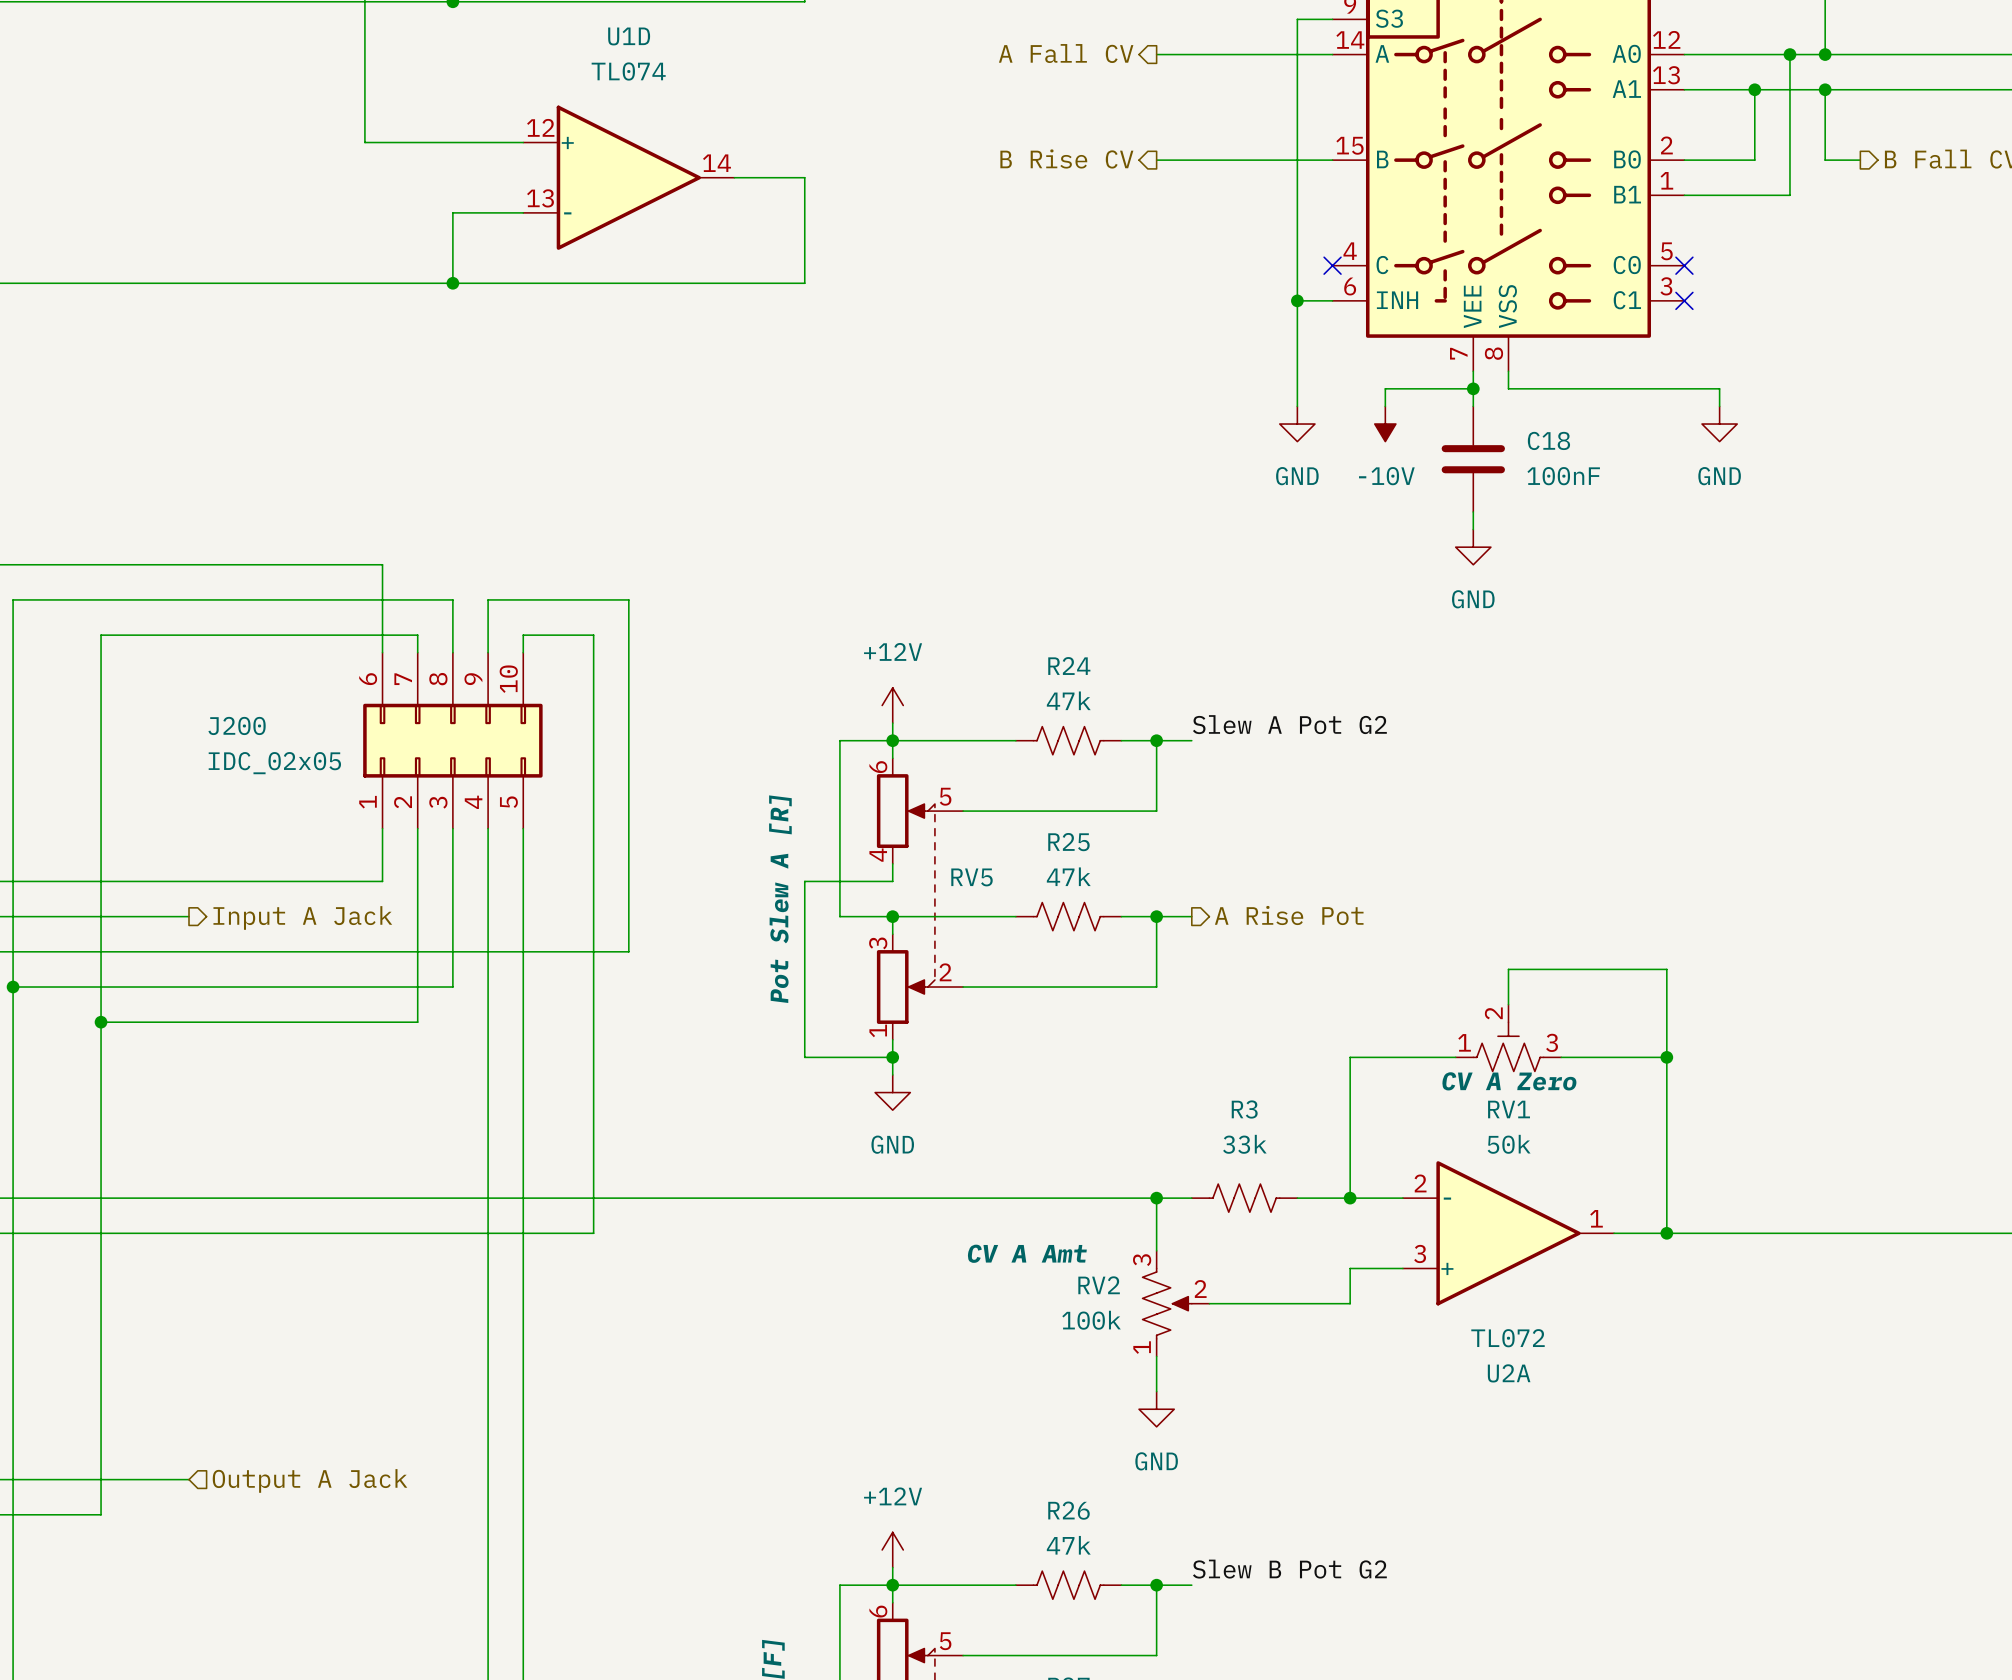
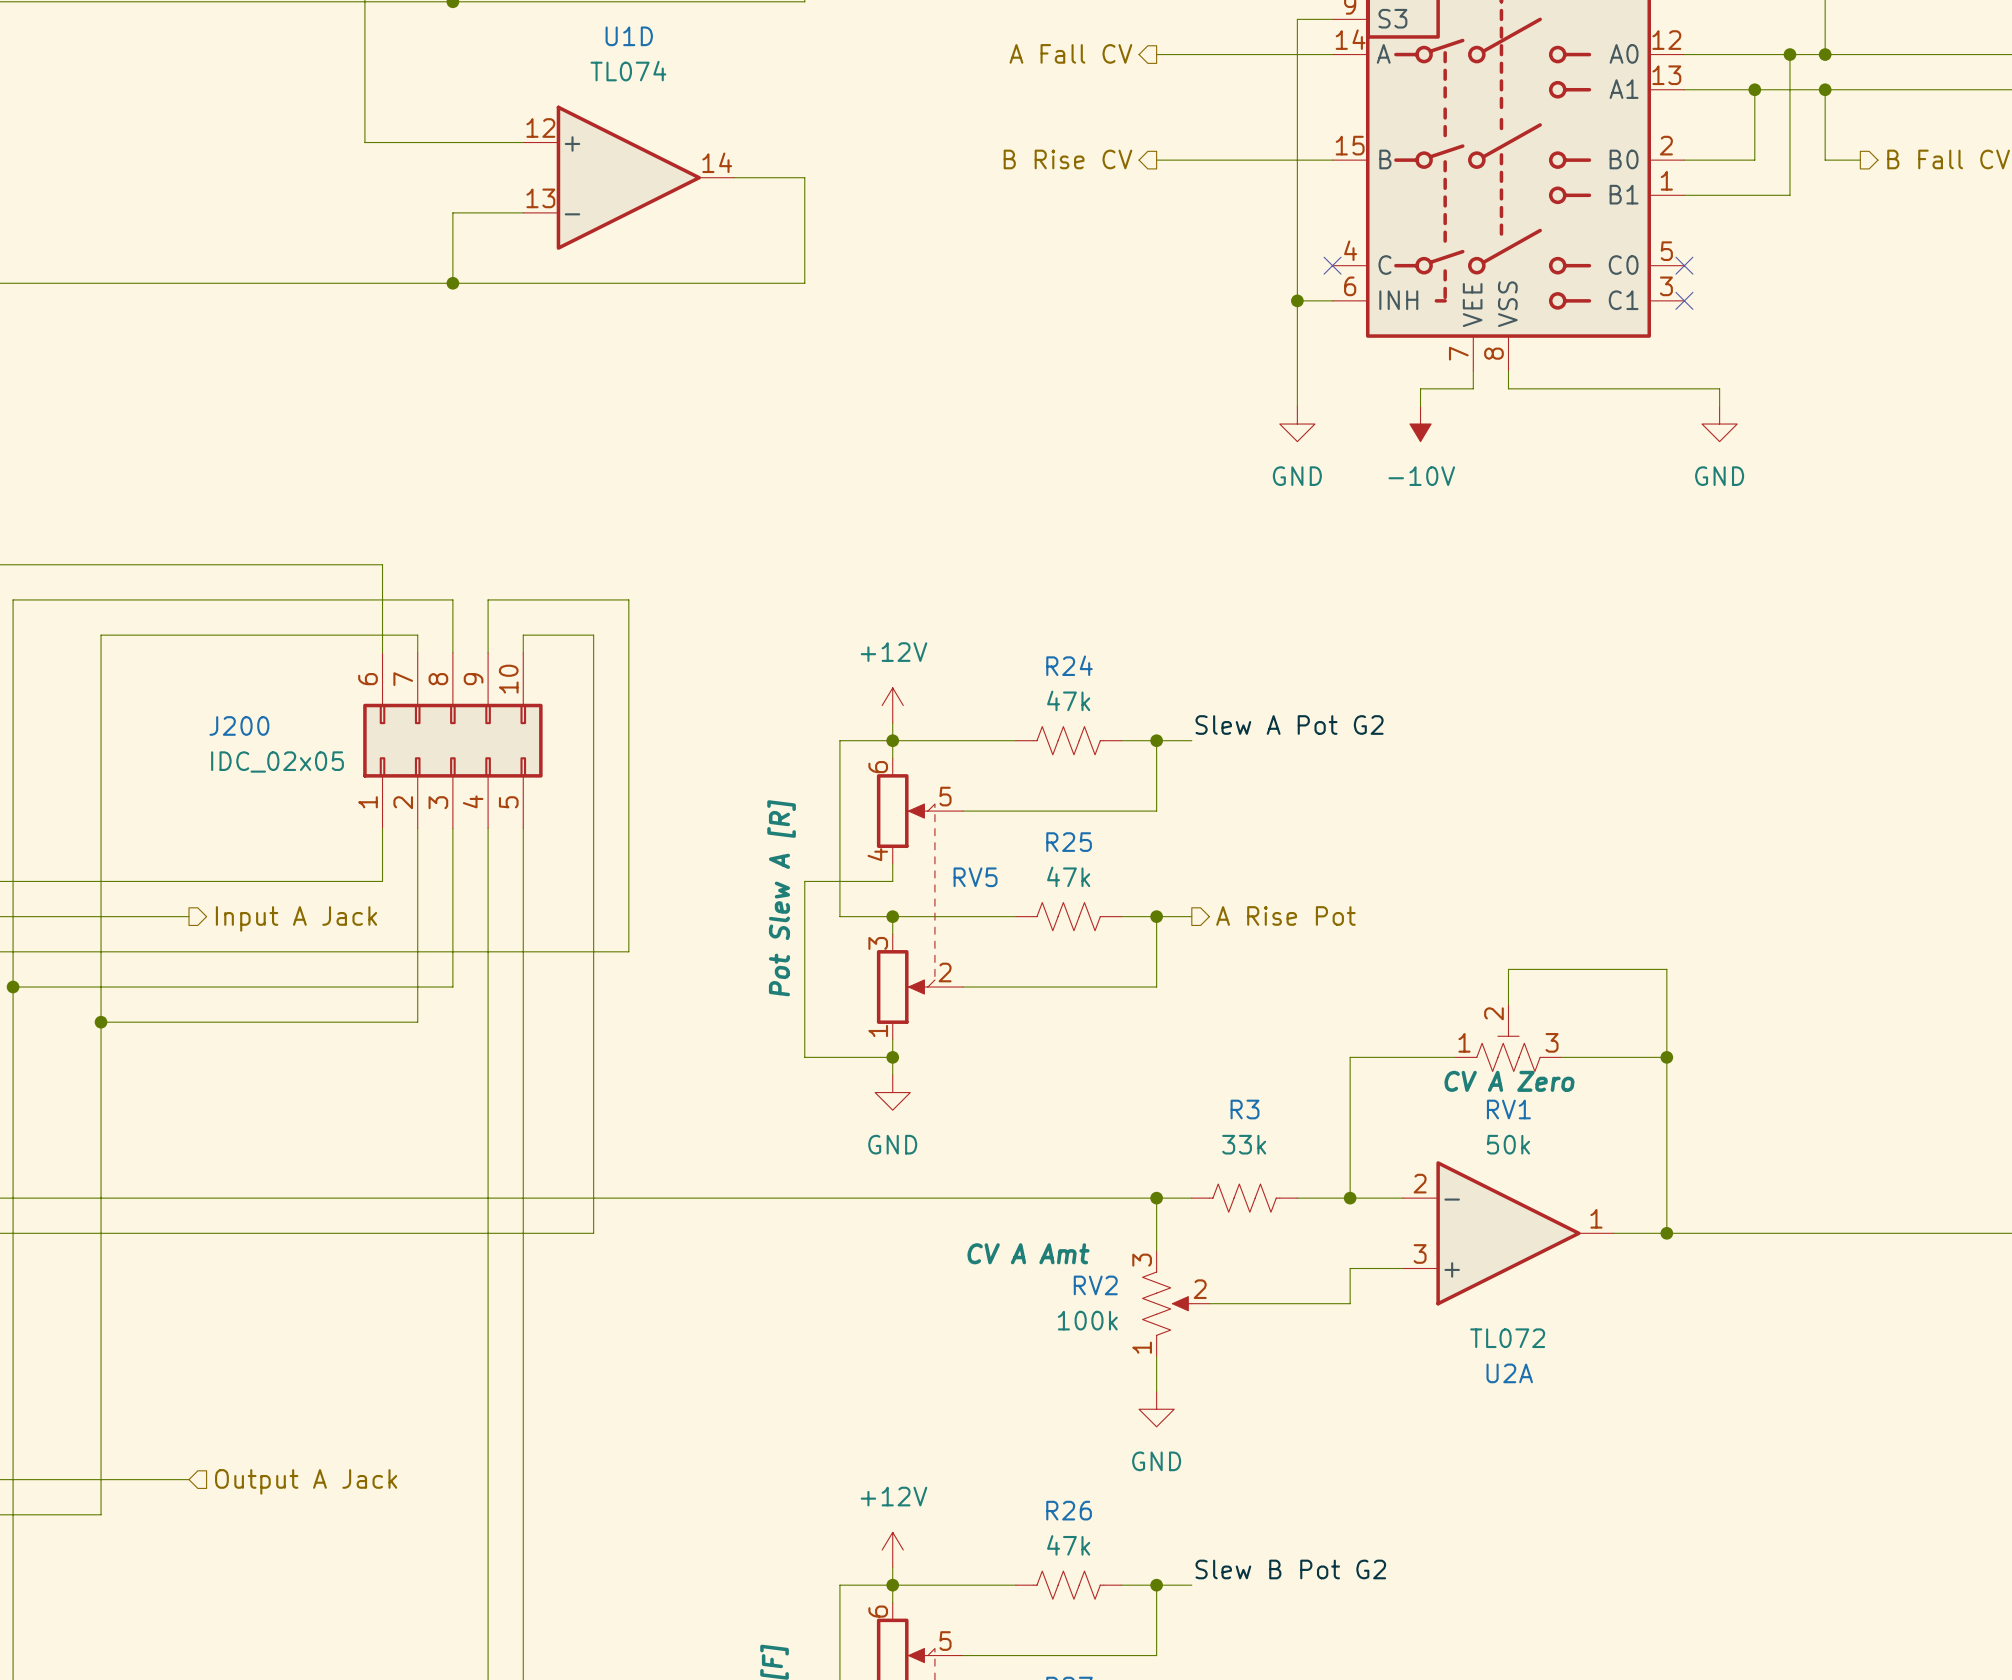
wire: (1420, 388) (1385, 388) (1385, 406) -> (1420, 388) (1420, 406)
wire: (1473, 388) (1473, 406) -> none
junction: (1473, 388) -> none
power symbol position: -10V (1385, 424) -> -10V (1420, 424)
C18: 100nF (1473, 459) -> none
wire: (1473, 511) (1473, 529) -> none
power symbol: GND (1473, 547) -> none

